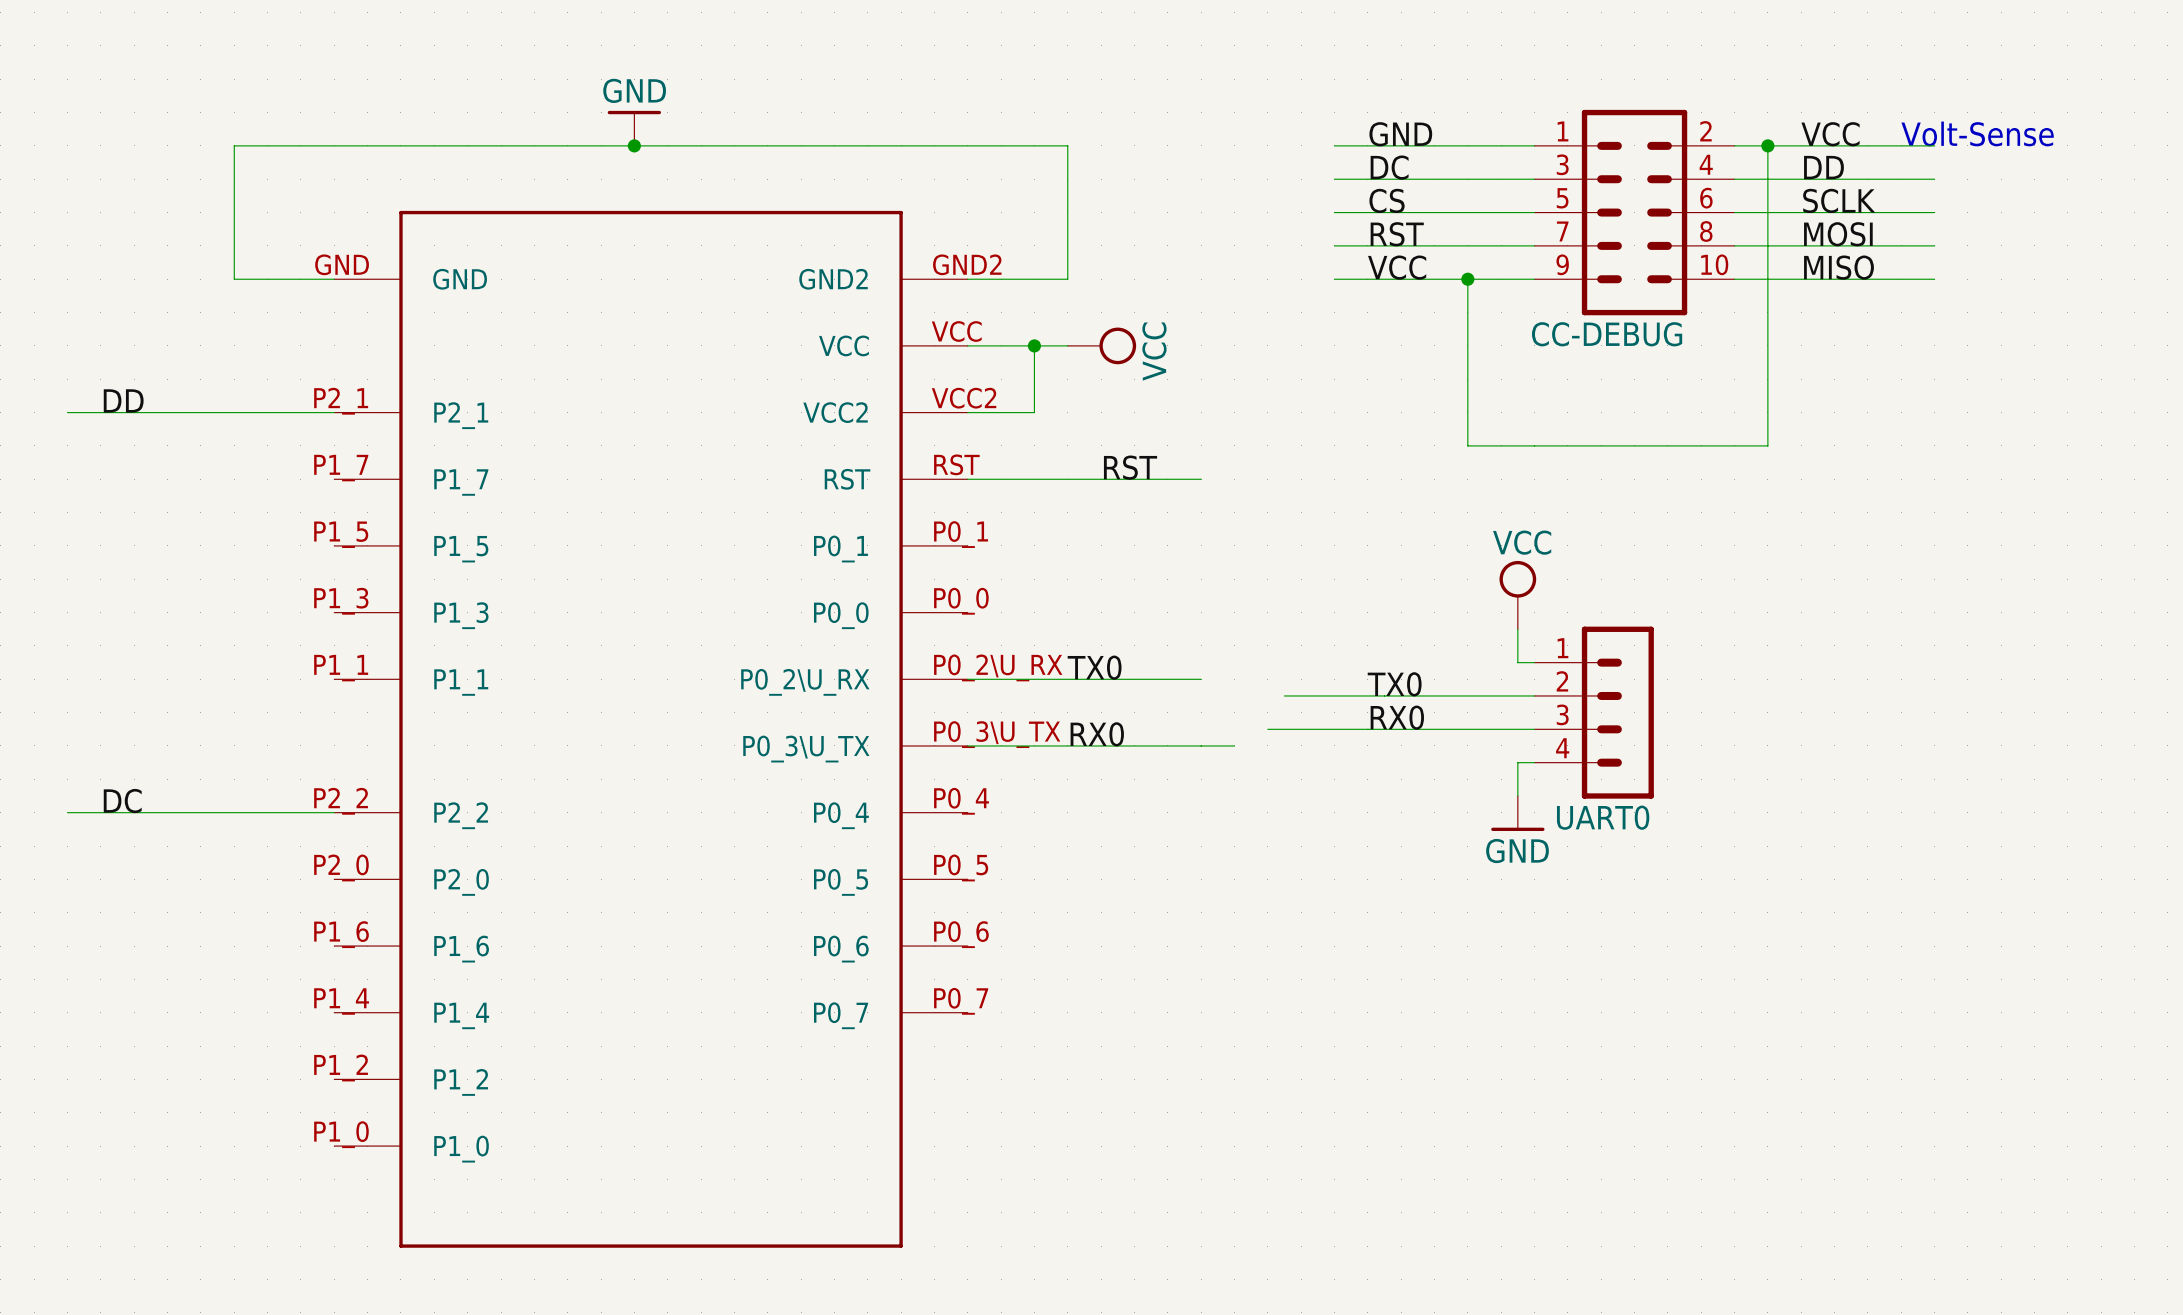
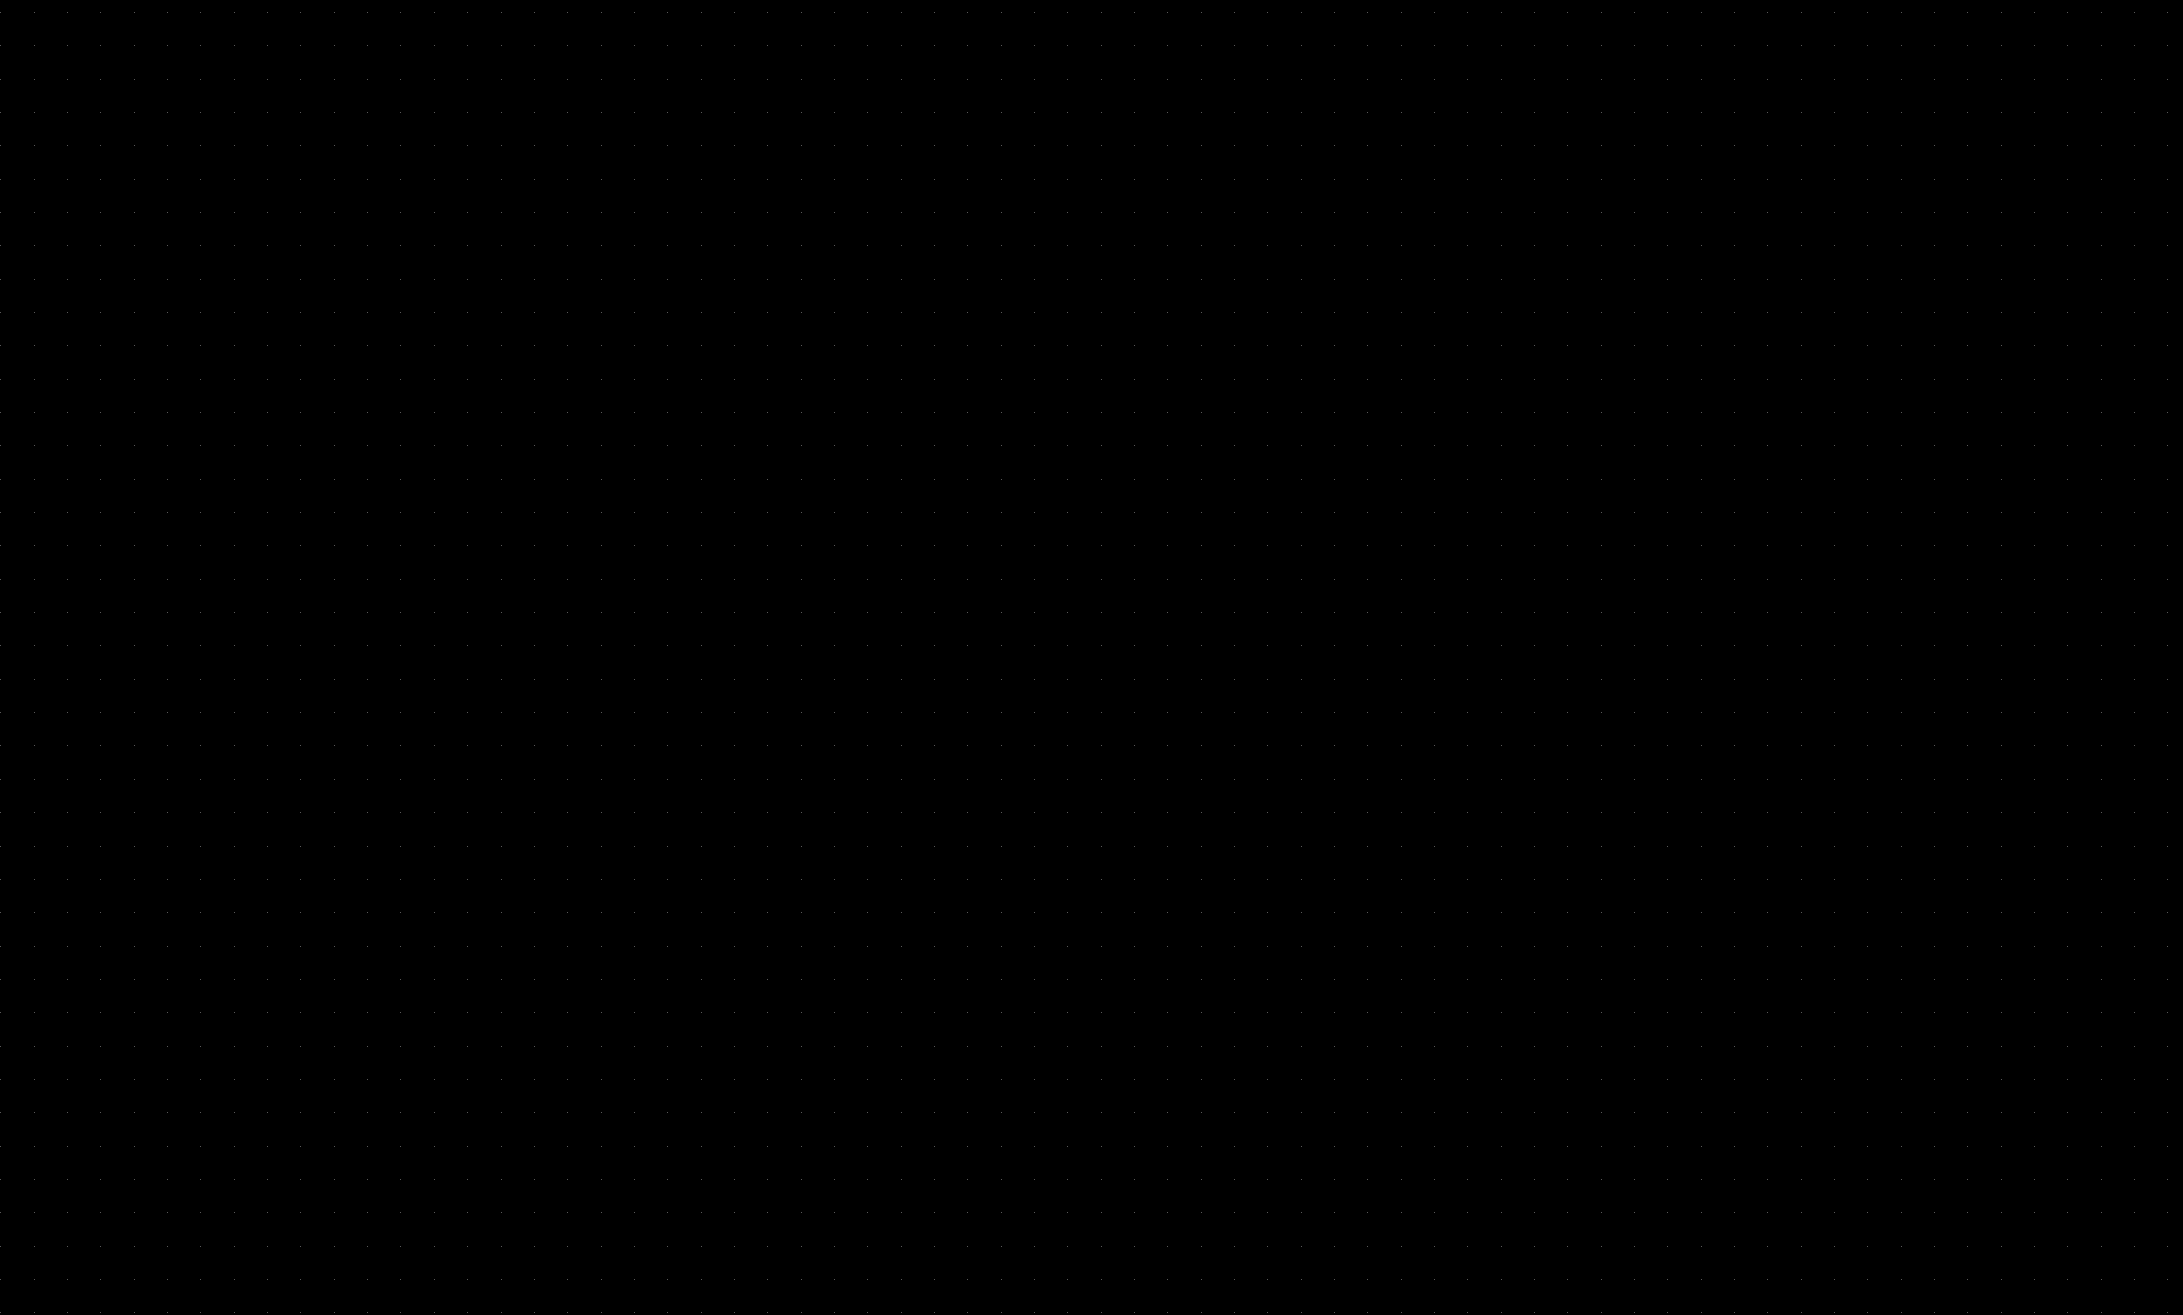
power symbol: GND (634, 128) -> none
text: Volt-Sense (1977, 133) -> none
label: GND (1400, 134) -> none
label: VCC (1830, 134) -> none
junction: (634, 145) -> none
wire: (1334, 145) (1534, 145) -> none
wire: (1734, 145) (1934, 145) -> none
wire: (1767, 145) (1767, 445) (1467, 445) (1467, 279) -> none
junction: (1767, 145) -> none
label: DC (1389, 167) -> none
label: DD (1823, 167) -> none
wire: (1334, 179) (1534, 179) -> none
wire: (1734, 179) (1934, 179) -> none
label: CS (1387, 200) -> none
label: SCLK (1839, 200) -> none
wire: (1334, 212) (1534, 212) -> none
CC-DEBUG: (1634, 212) -> none
wire: (1734, 212) (1934, 212) -> none
label: RST (1397, 234) -> none
label: MOSI (1838, 234) -> none
wire: (1334, 245) (1534, 245) -> none
wire: (1734, 245) (1934, 245) -> none
label: VCC (1397, 267) -> none
label: MISO (1838, 267) -> none
wire: (334, 279) (234, 279) (234, 145) (1067, 145) (1067, 279) (967, 279) -> none
wire: (1334, 279) (1534, 279) -> none
junction: (1467, 279) -> none
wire: (1734, 279) (1934, 279) -> none
wire: (967, 345) (1067, 345) -> none
wire: (1034, 345) (1034, 412) (967, 412) -> none
junction: (1034, 345) -> none
power symbol: VCC (1101, 345) -> none
label: DD (123, 400) -> none
wire: (67, 412) (334, 412) -> none
label: RST (1130, 467) -> none
wire: (967, 479) (1201, 479) -> none
power symbol: VCC (1517, 595) -> none
wire: (1517, 629) (1517, 662) (1534, 662) -> none
label: TX0 (1094, 667) -> none
wire: (967, 679) (1201, 679) -> none
label: TX0 (1394, 684) -> none
wire: (1284, 695) (1534, 695) -> none
UART0: (1594, 712) -> none
label: RX0 (1397, 717) -> none
part: (651, 729) -> none
wire: (1267, 729) (1534, 729) -> none
label: RX0 (1097, 734) -> none
wire: (967, 745) (1234, 745) -> none
wire: (1534, 762) (1517, 762) (1517, 796) -> none
label: DC (122, 801) -> none
wire: (67, 812) (334, 812) -> none
power symbol: GND (1517, 813) -> none

